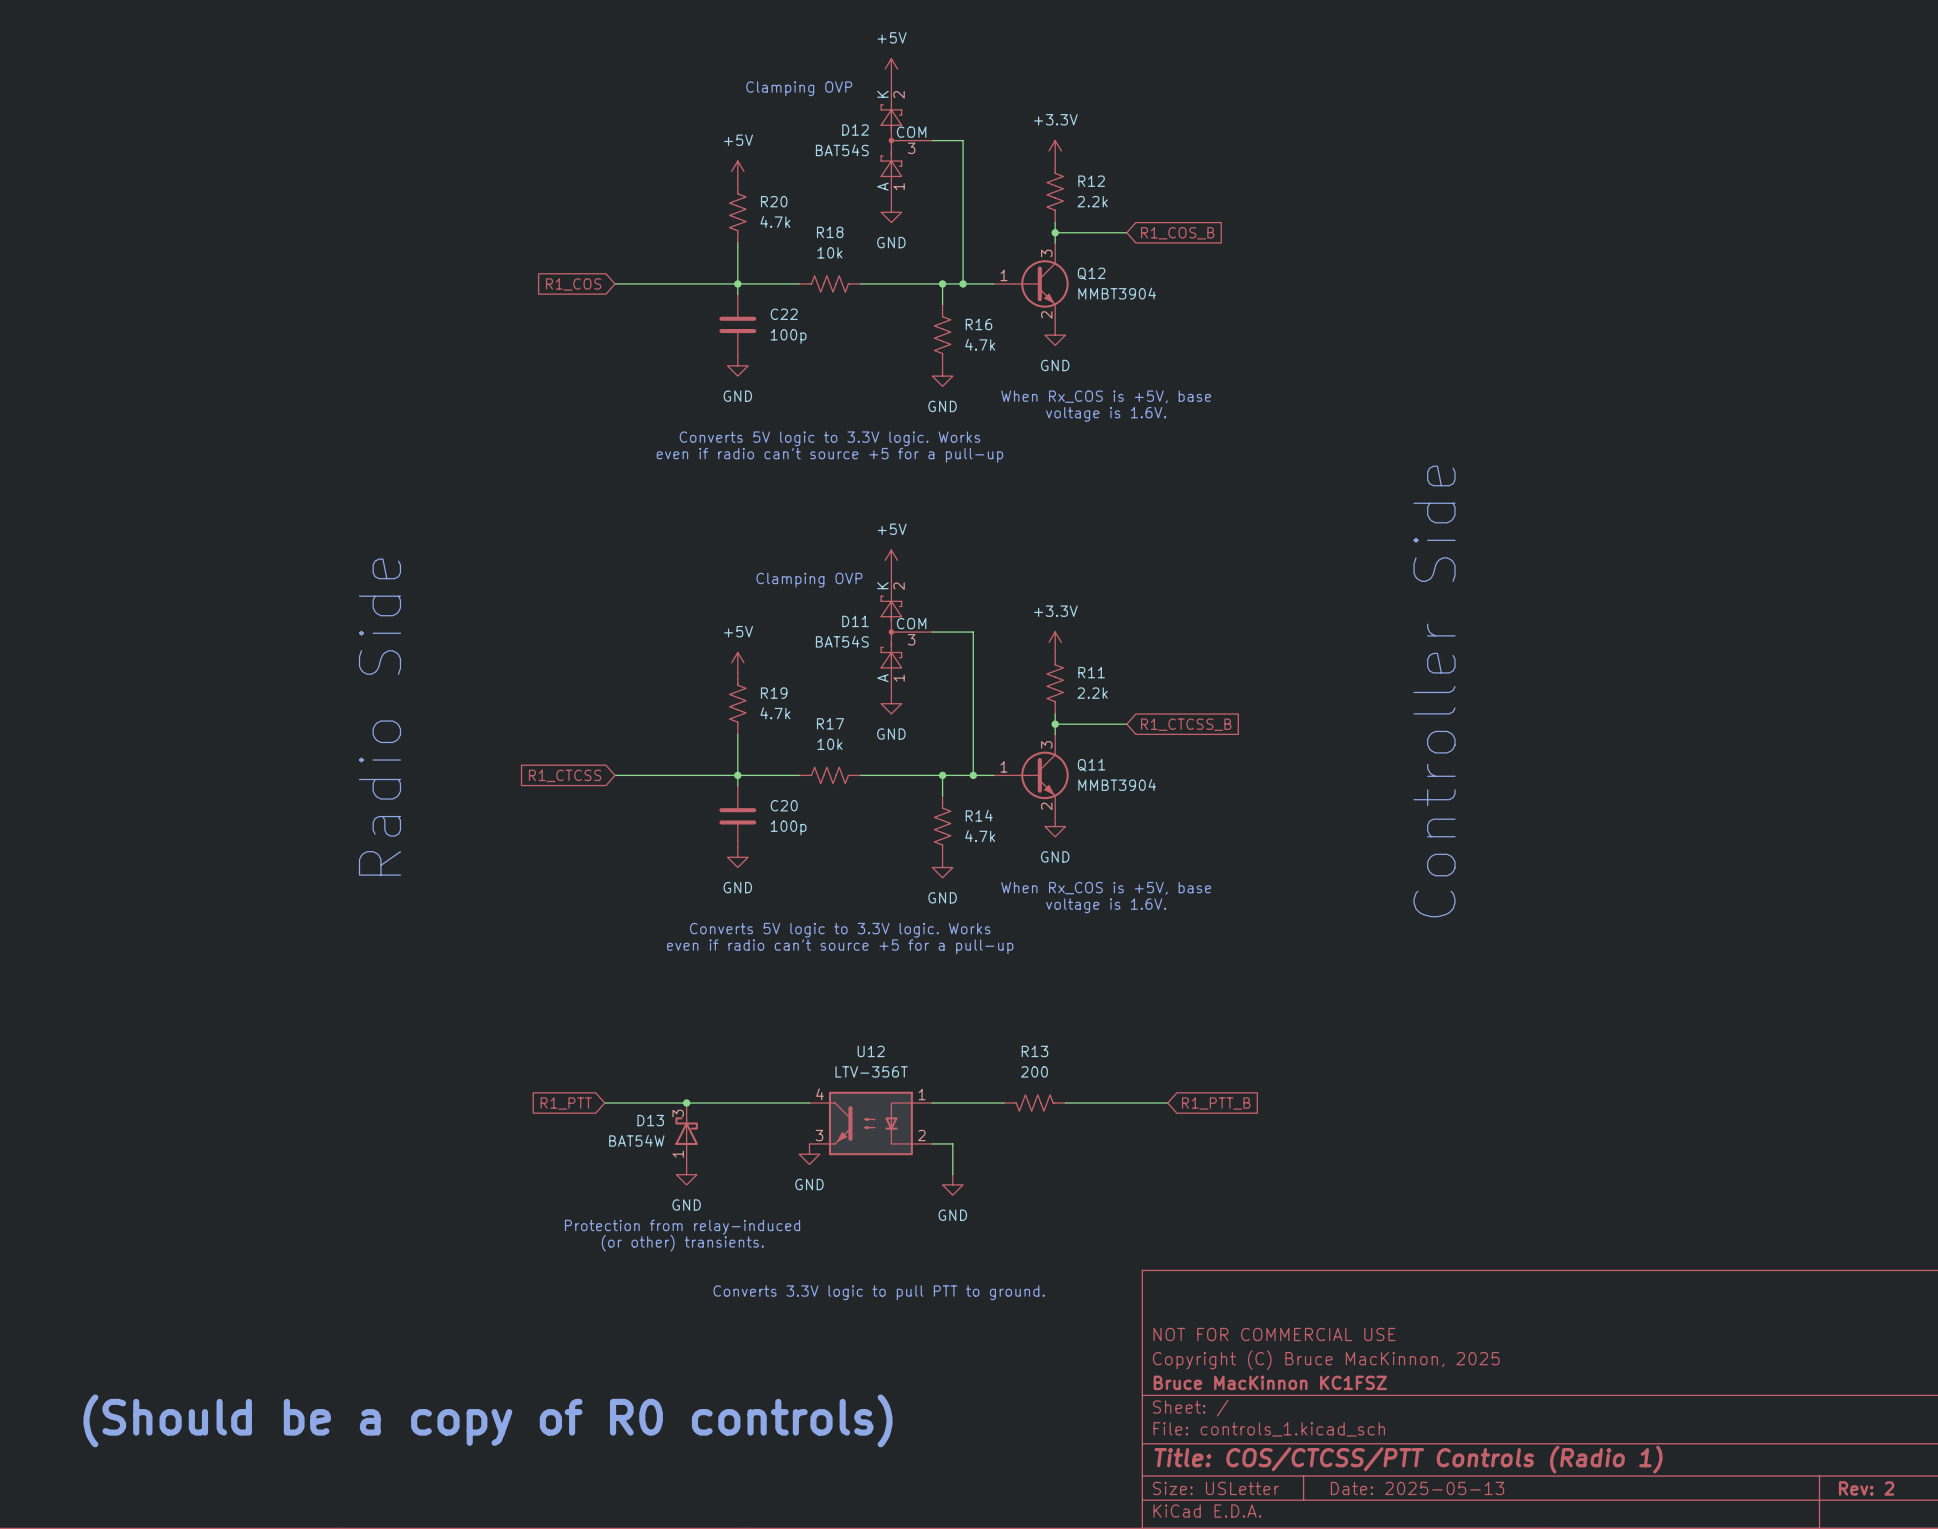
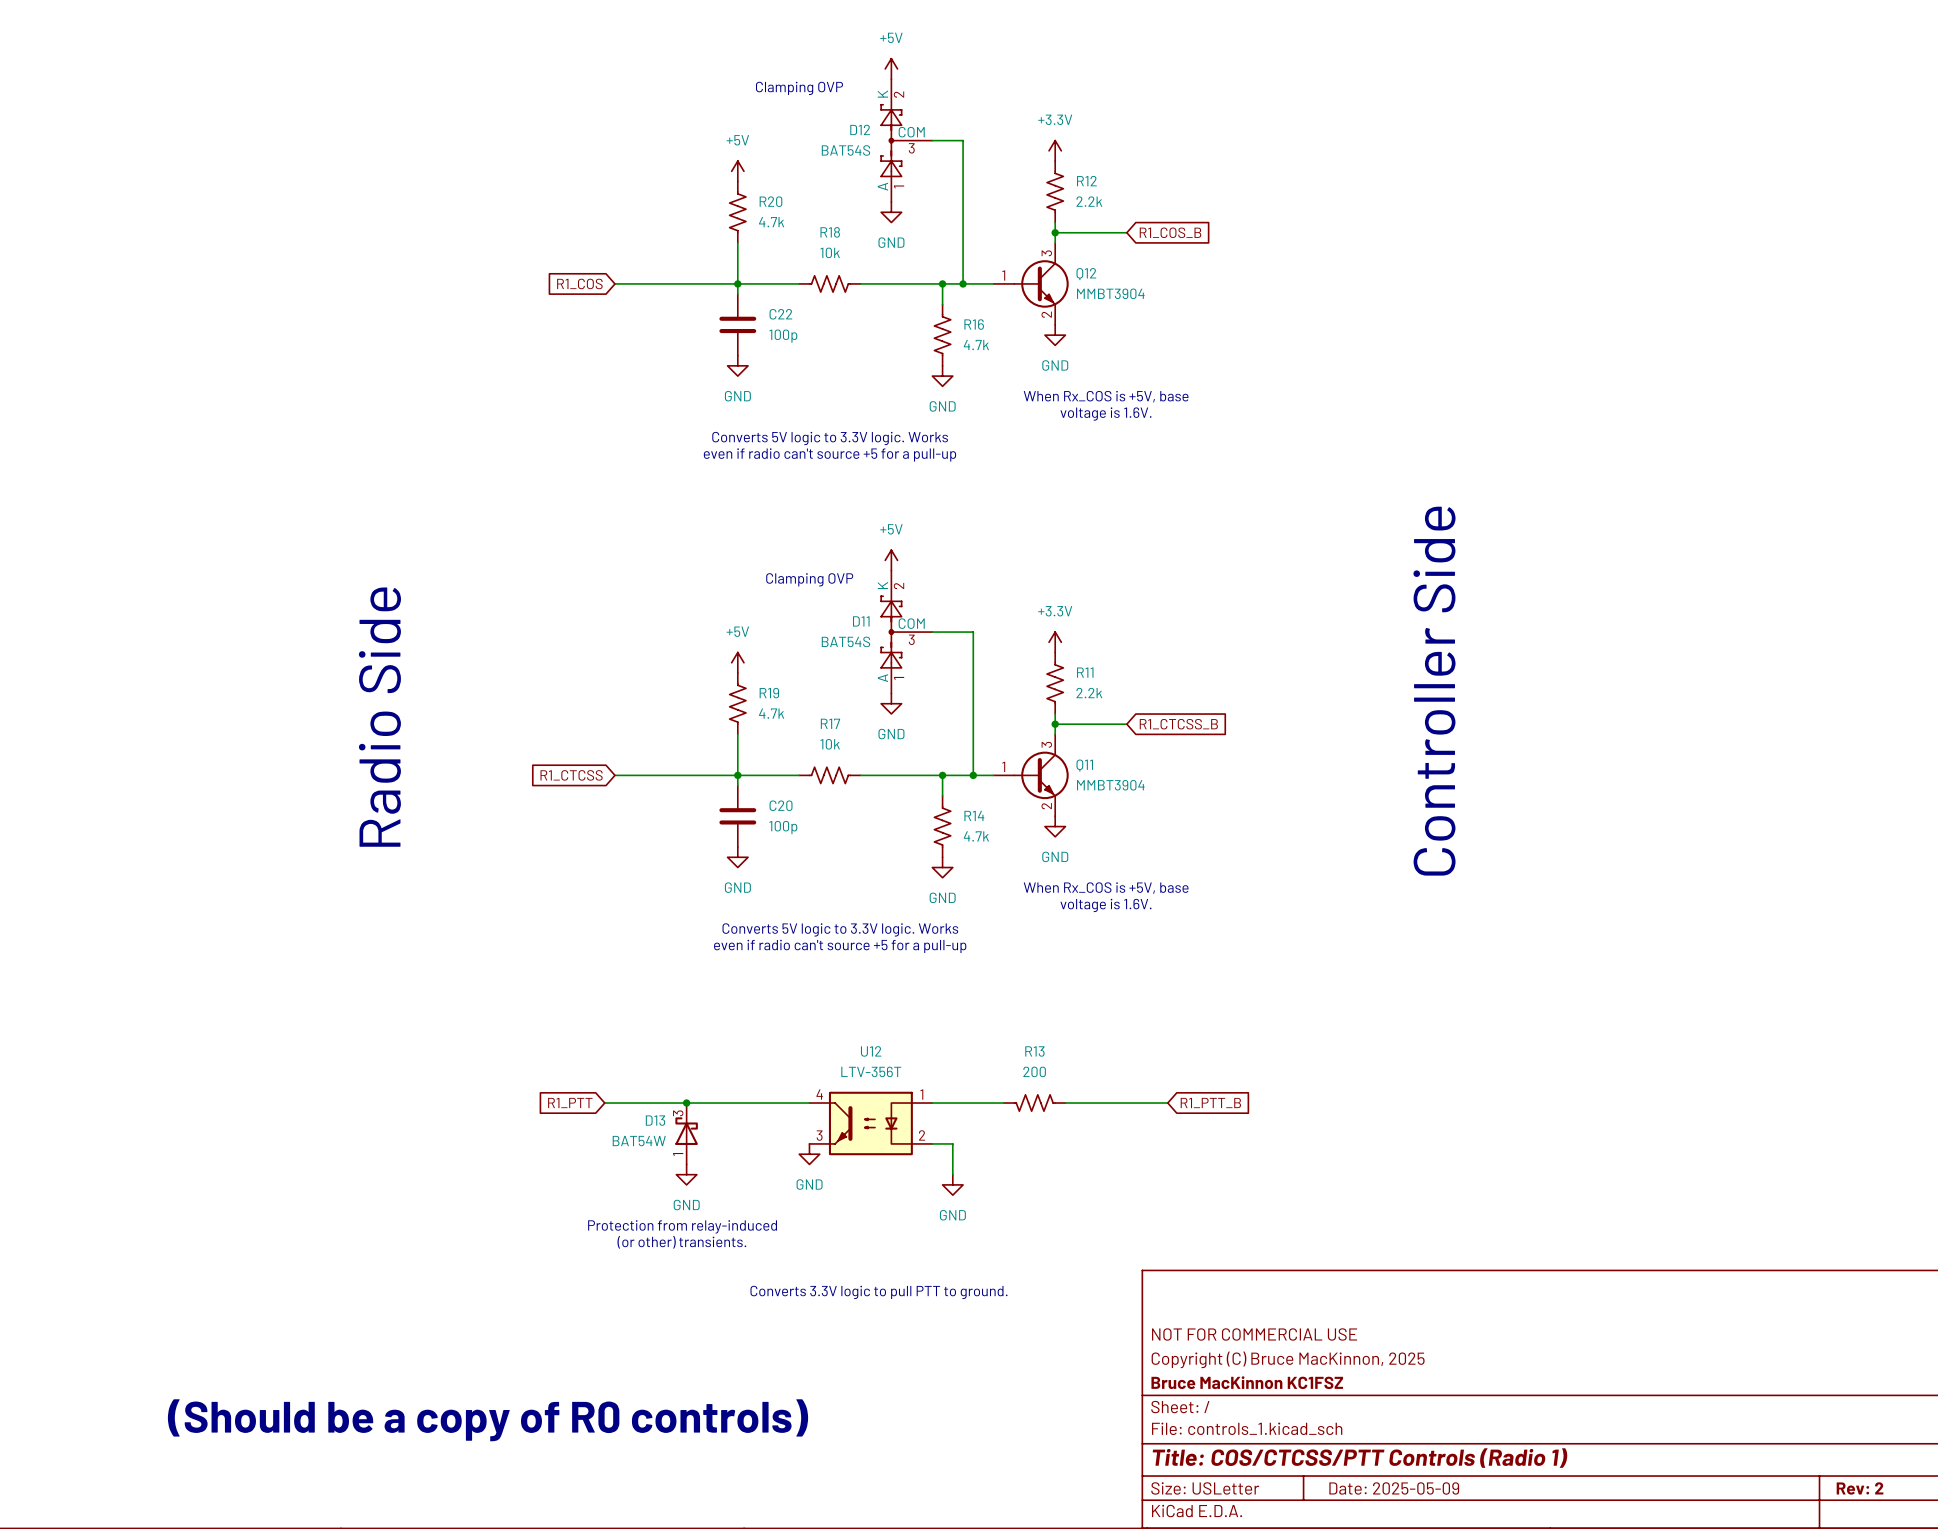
title block: Date: 2025-05-13 (1417, 1488) -> Date: 2025-05-09 (1394, 1488)

